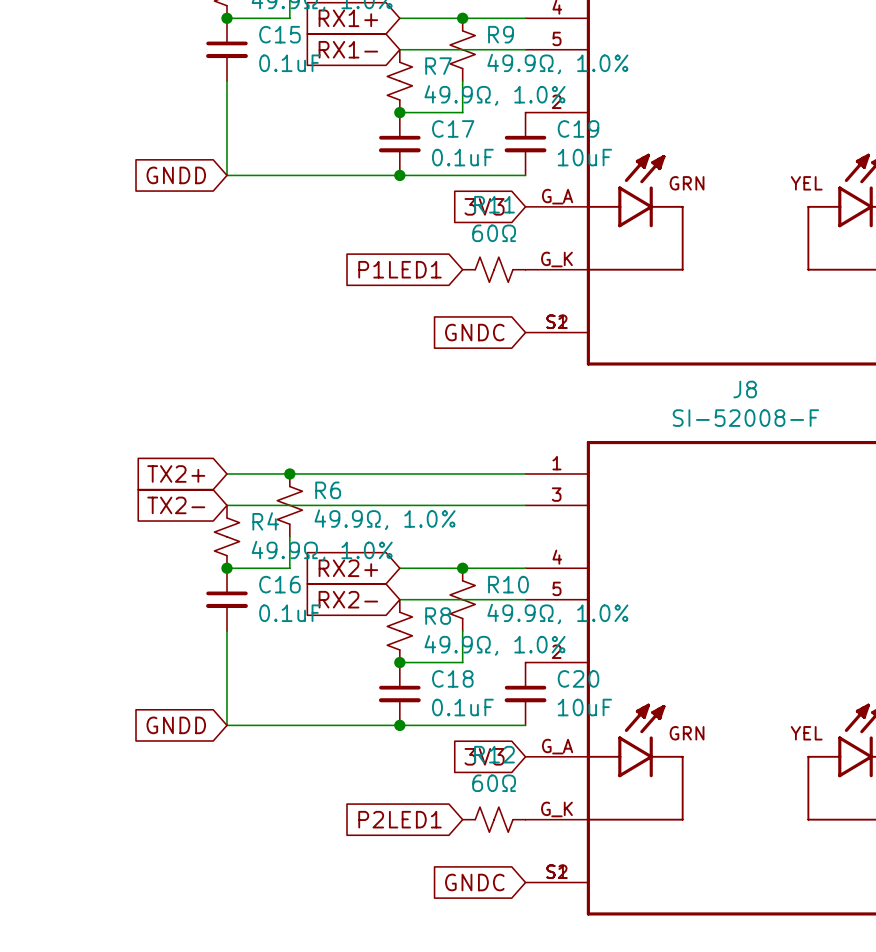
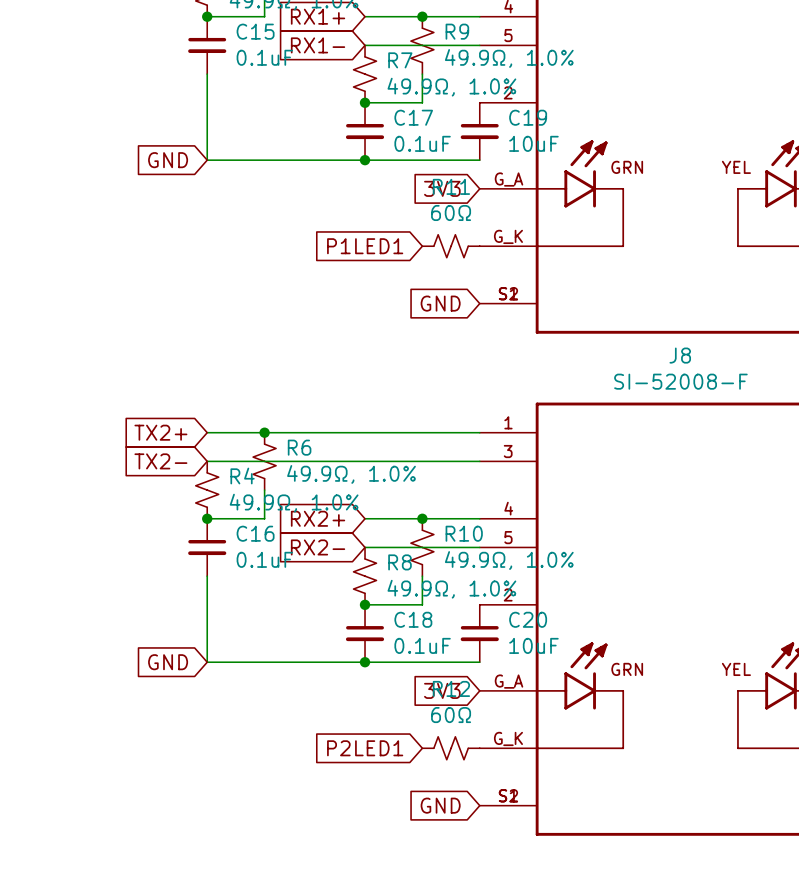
global label: GNDD (176, 175) -> GND (168, 160)
global label: GNDC (474, 332) -> GND (440, 303)
global label: GNDD (176, 725) -> GND (168, 662)
global label: GNDC (474, 882) -> GND (440, 805)

